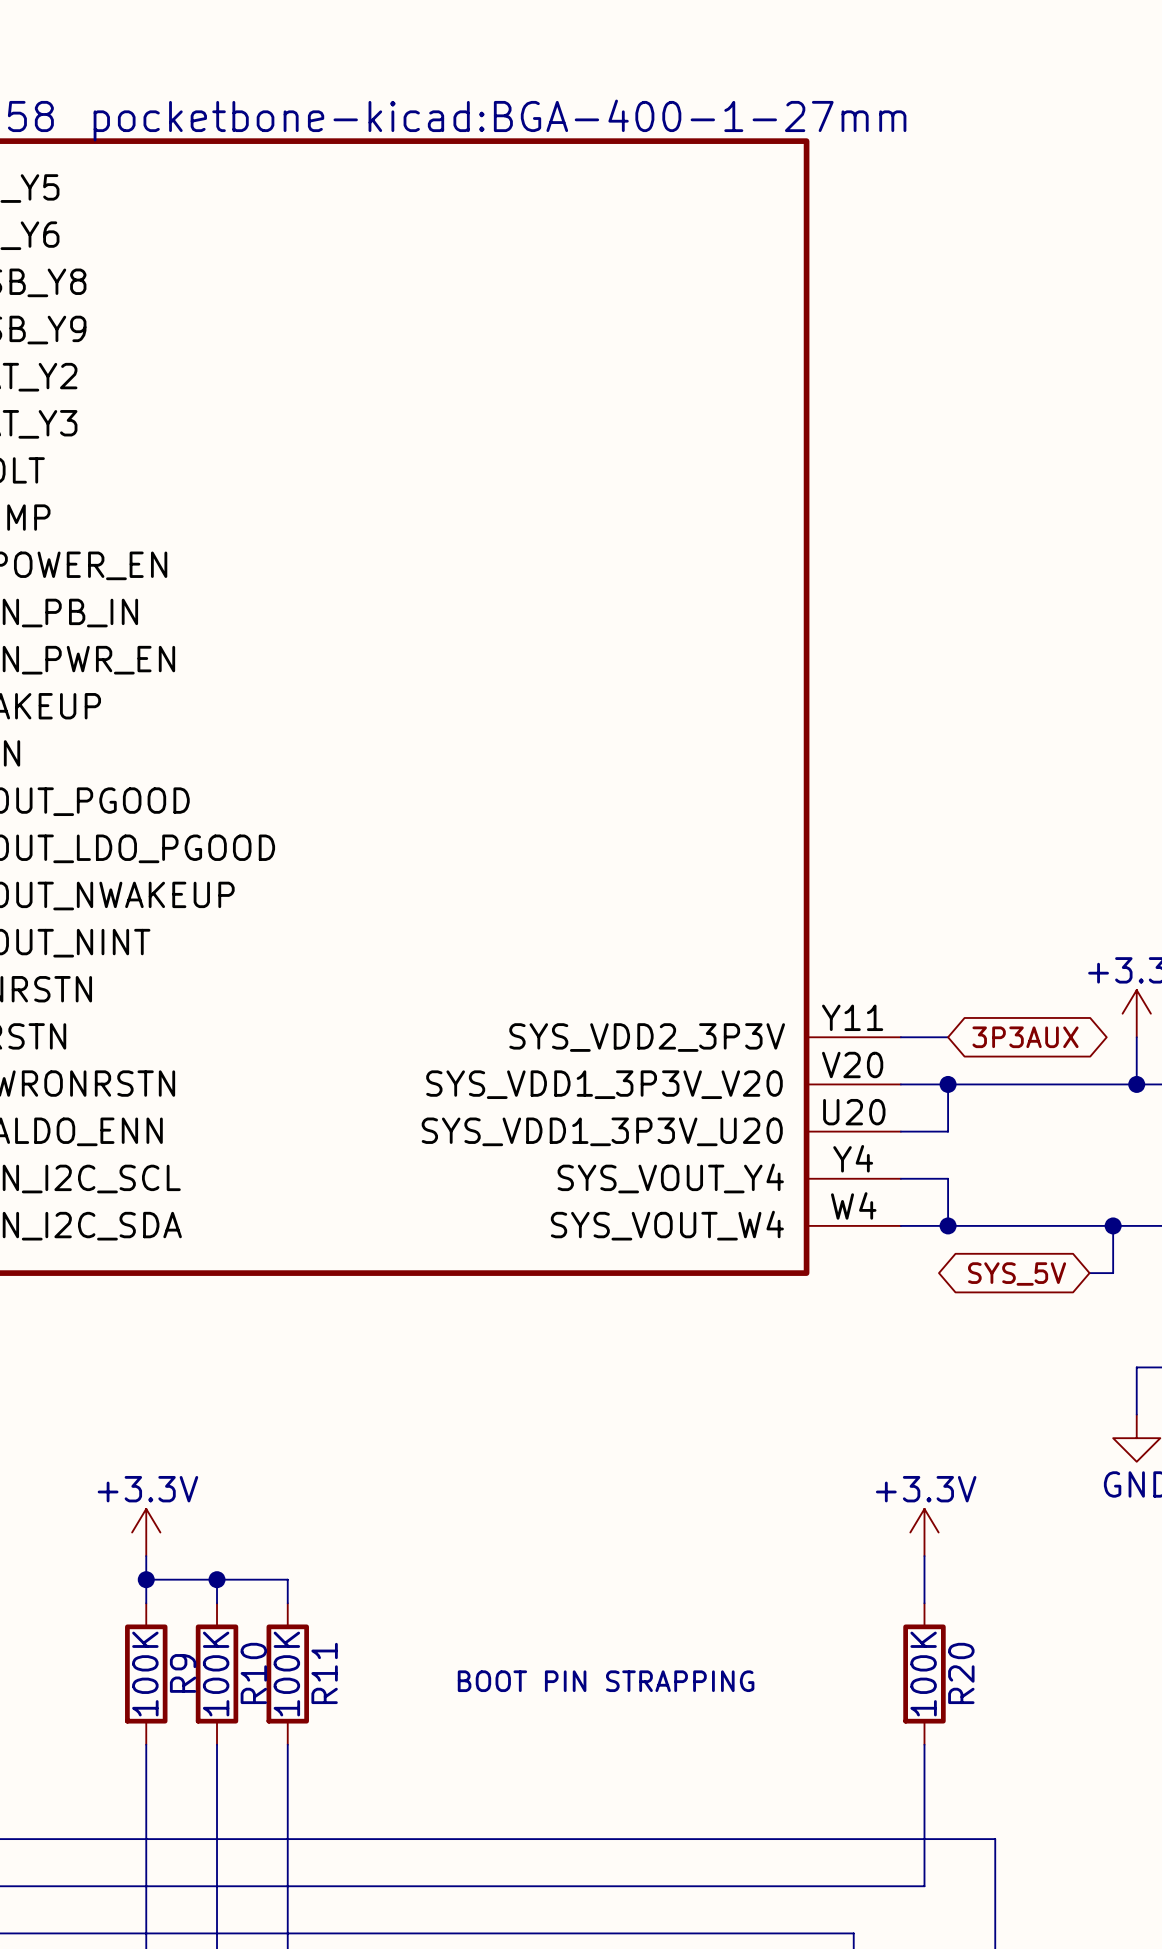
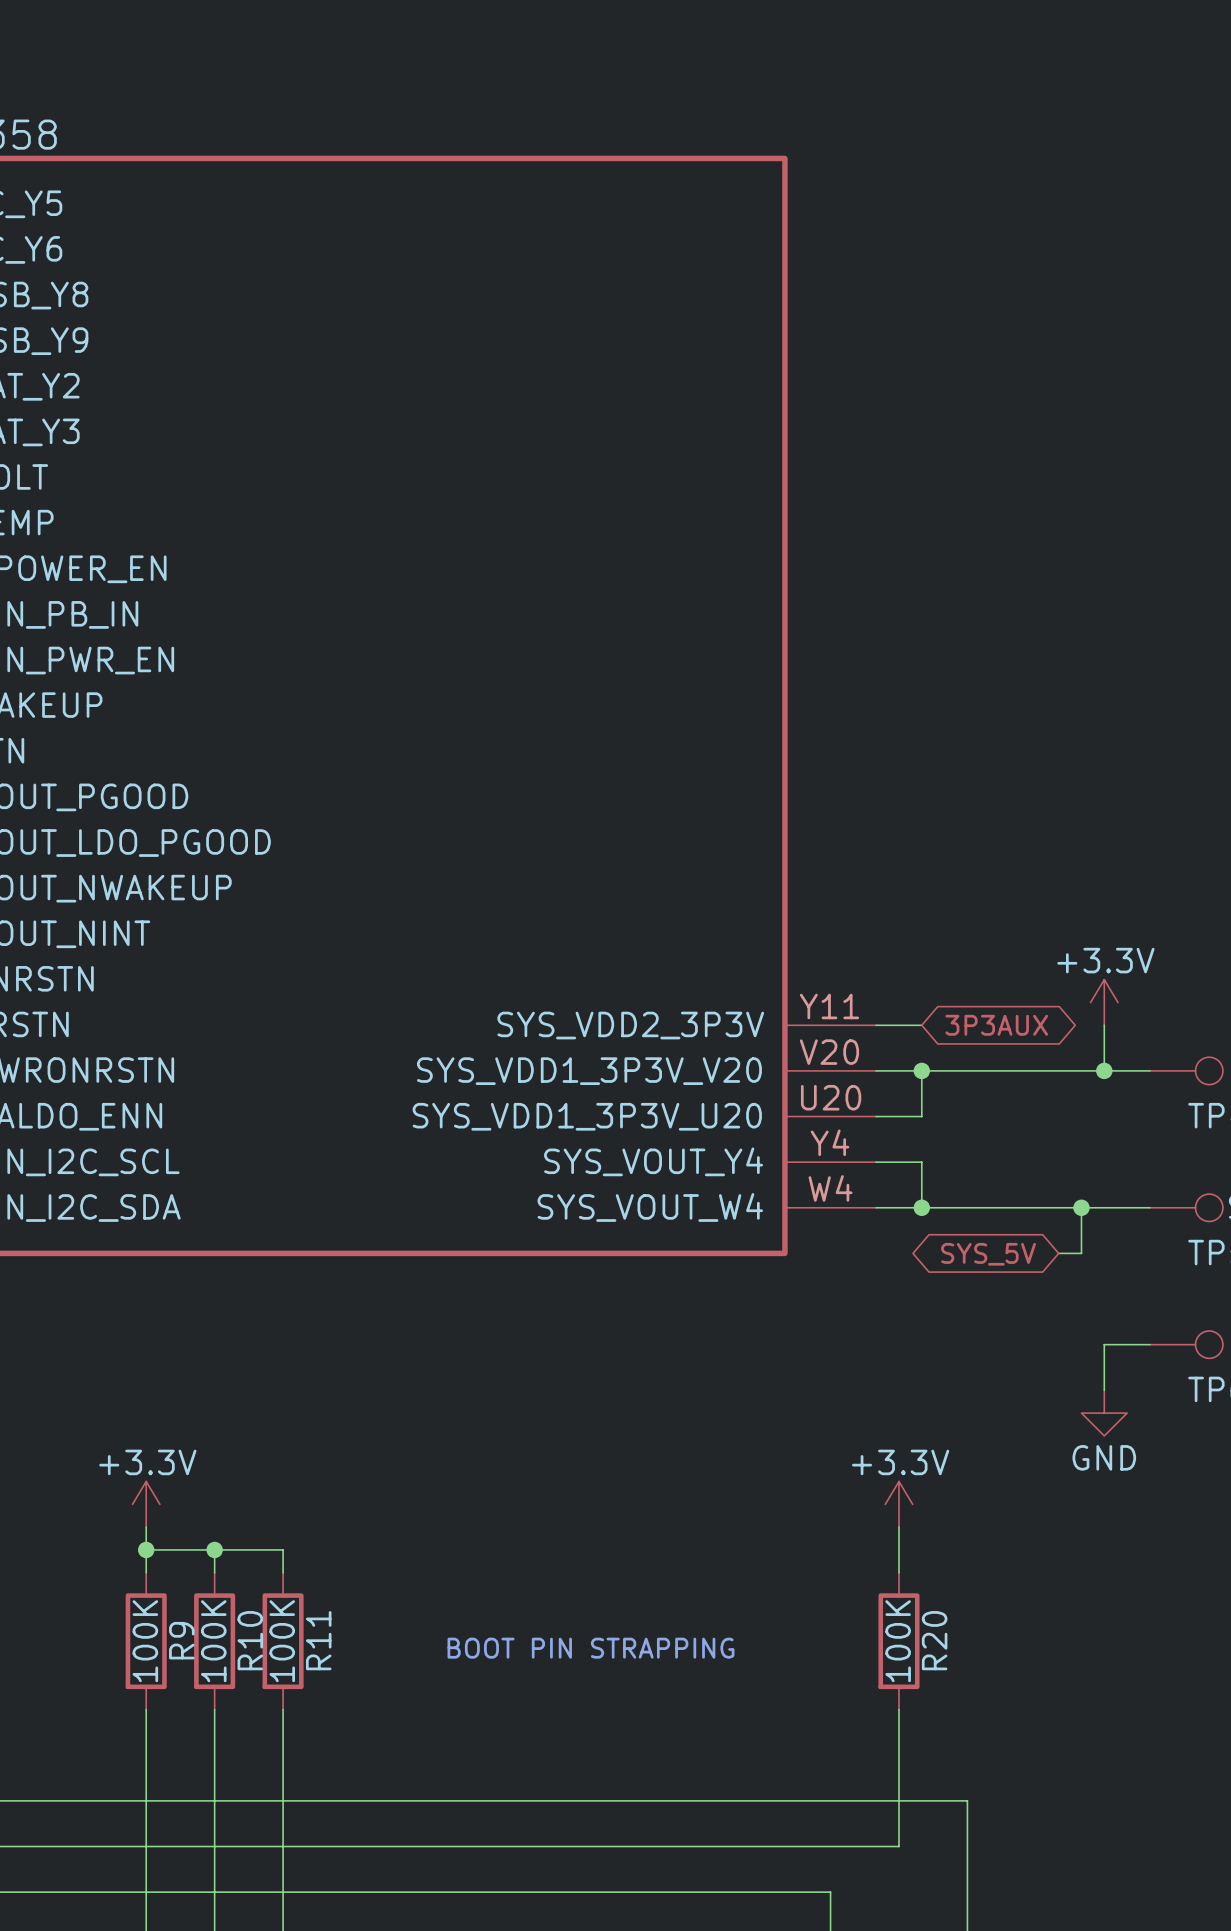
part text: pocketbone-kicad:BGA-400-1-27mm (500, 120) -> none

